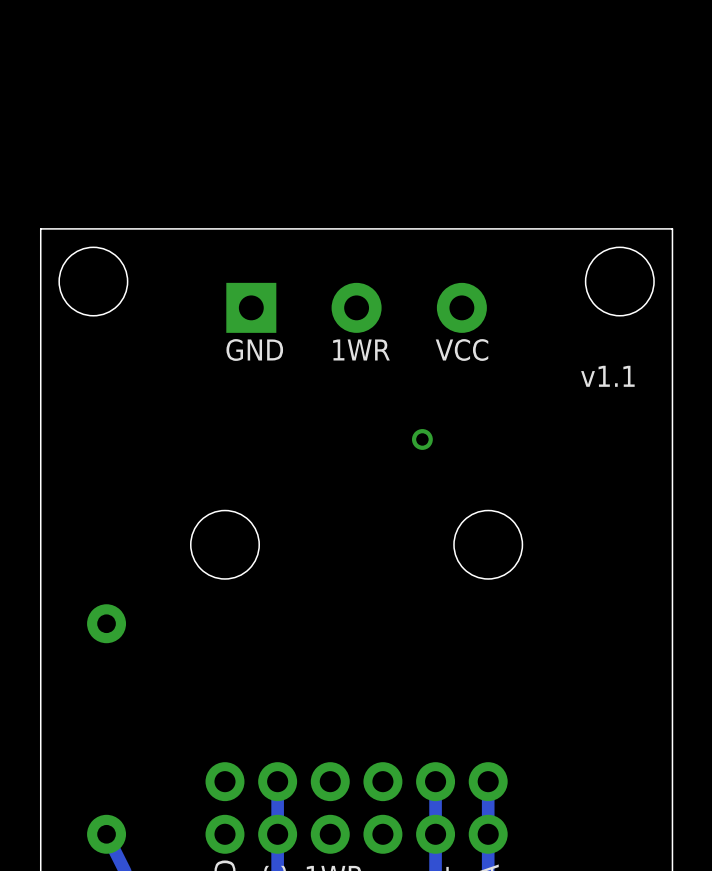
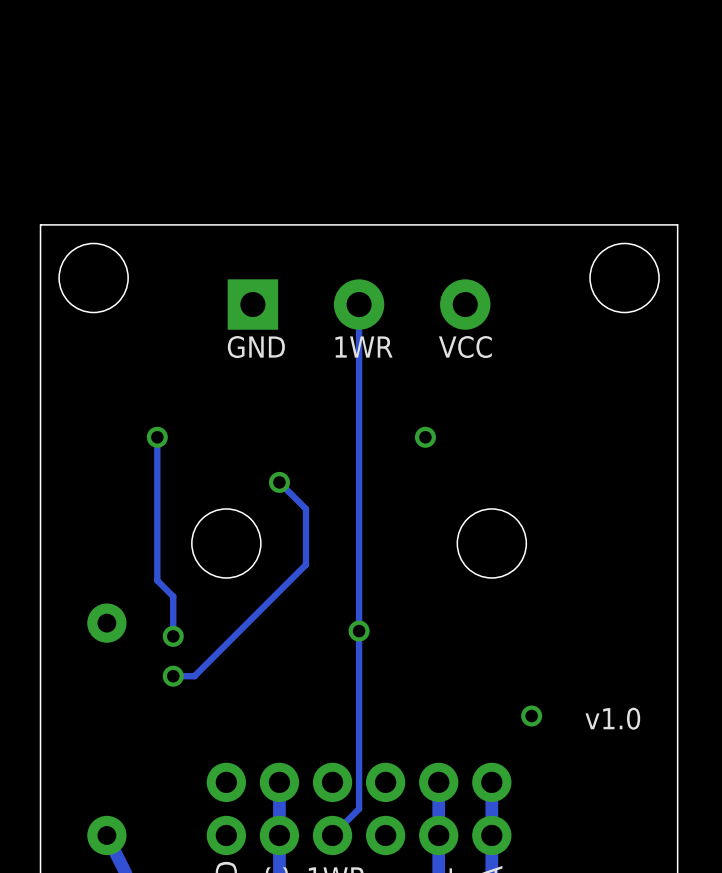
track: none -> (359, 304) (359, 808) (332, 835)
text: v1.1 (607, 376) -> none
track: none -> (157, 437) (157, 580) (173, 596) (173, 636)
via: none -> (157, 437)
track: none -> (279, 482) (305, 508) (305, 564) (194, 676) (173, 676)
via: none -> (279, 482)
via: none -> (359, 631)
via: none -> (173, 636)
via: none -> (173, 676)
via: none -> (531, 716)
text: none -> v1.0 (612, 718)

